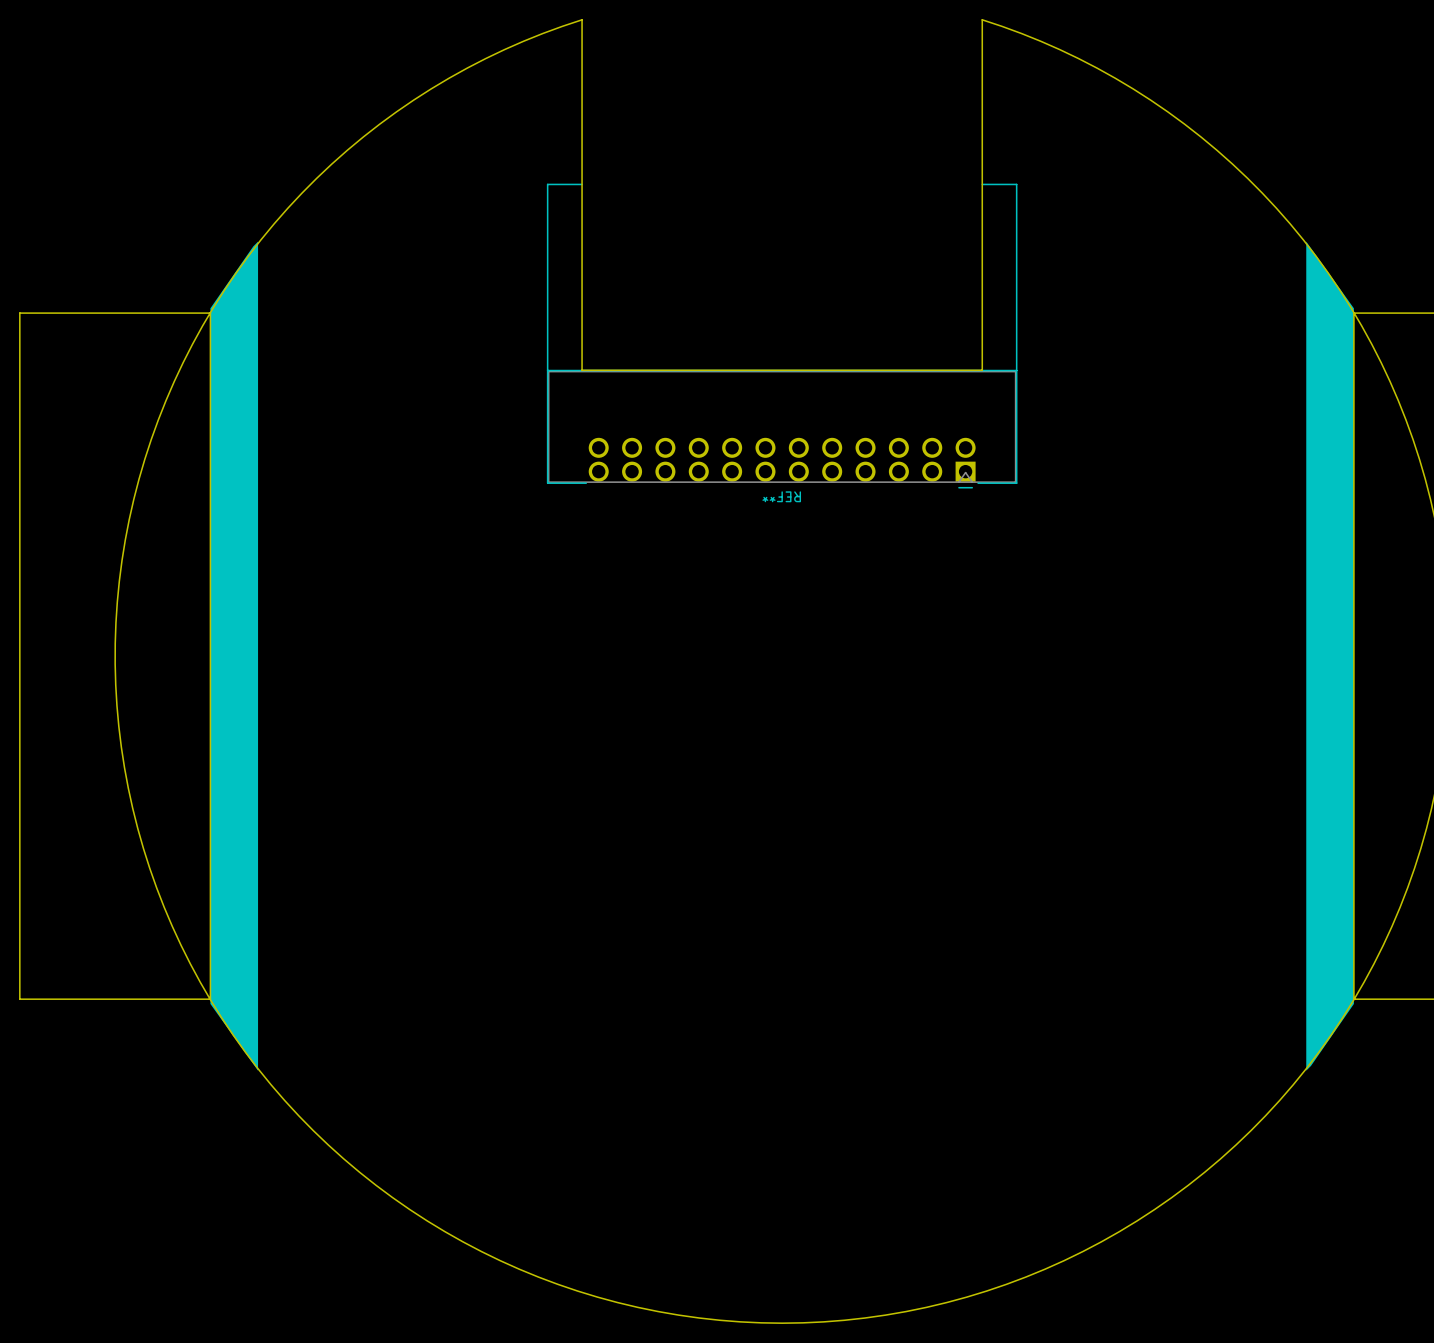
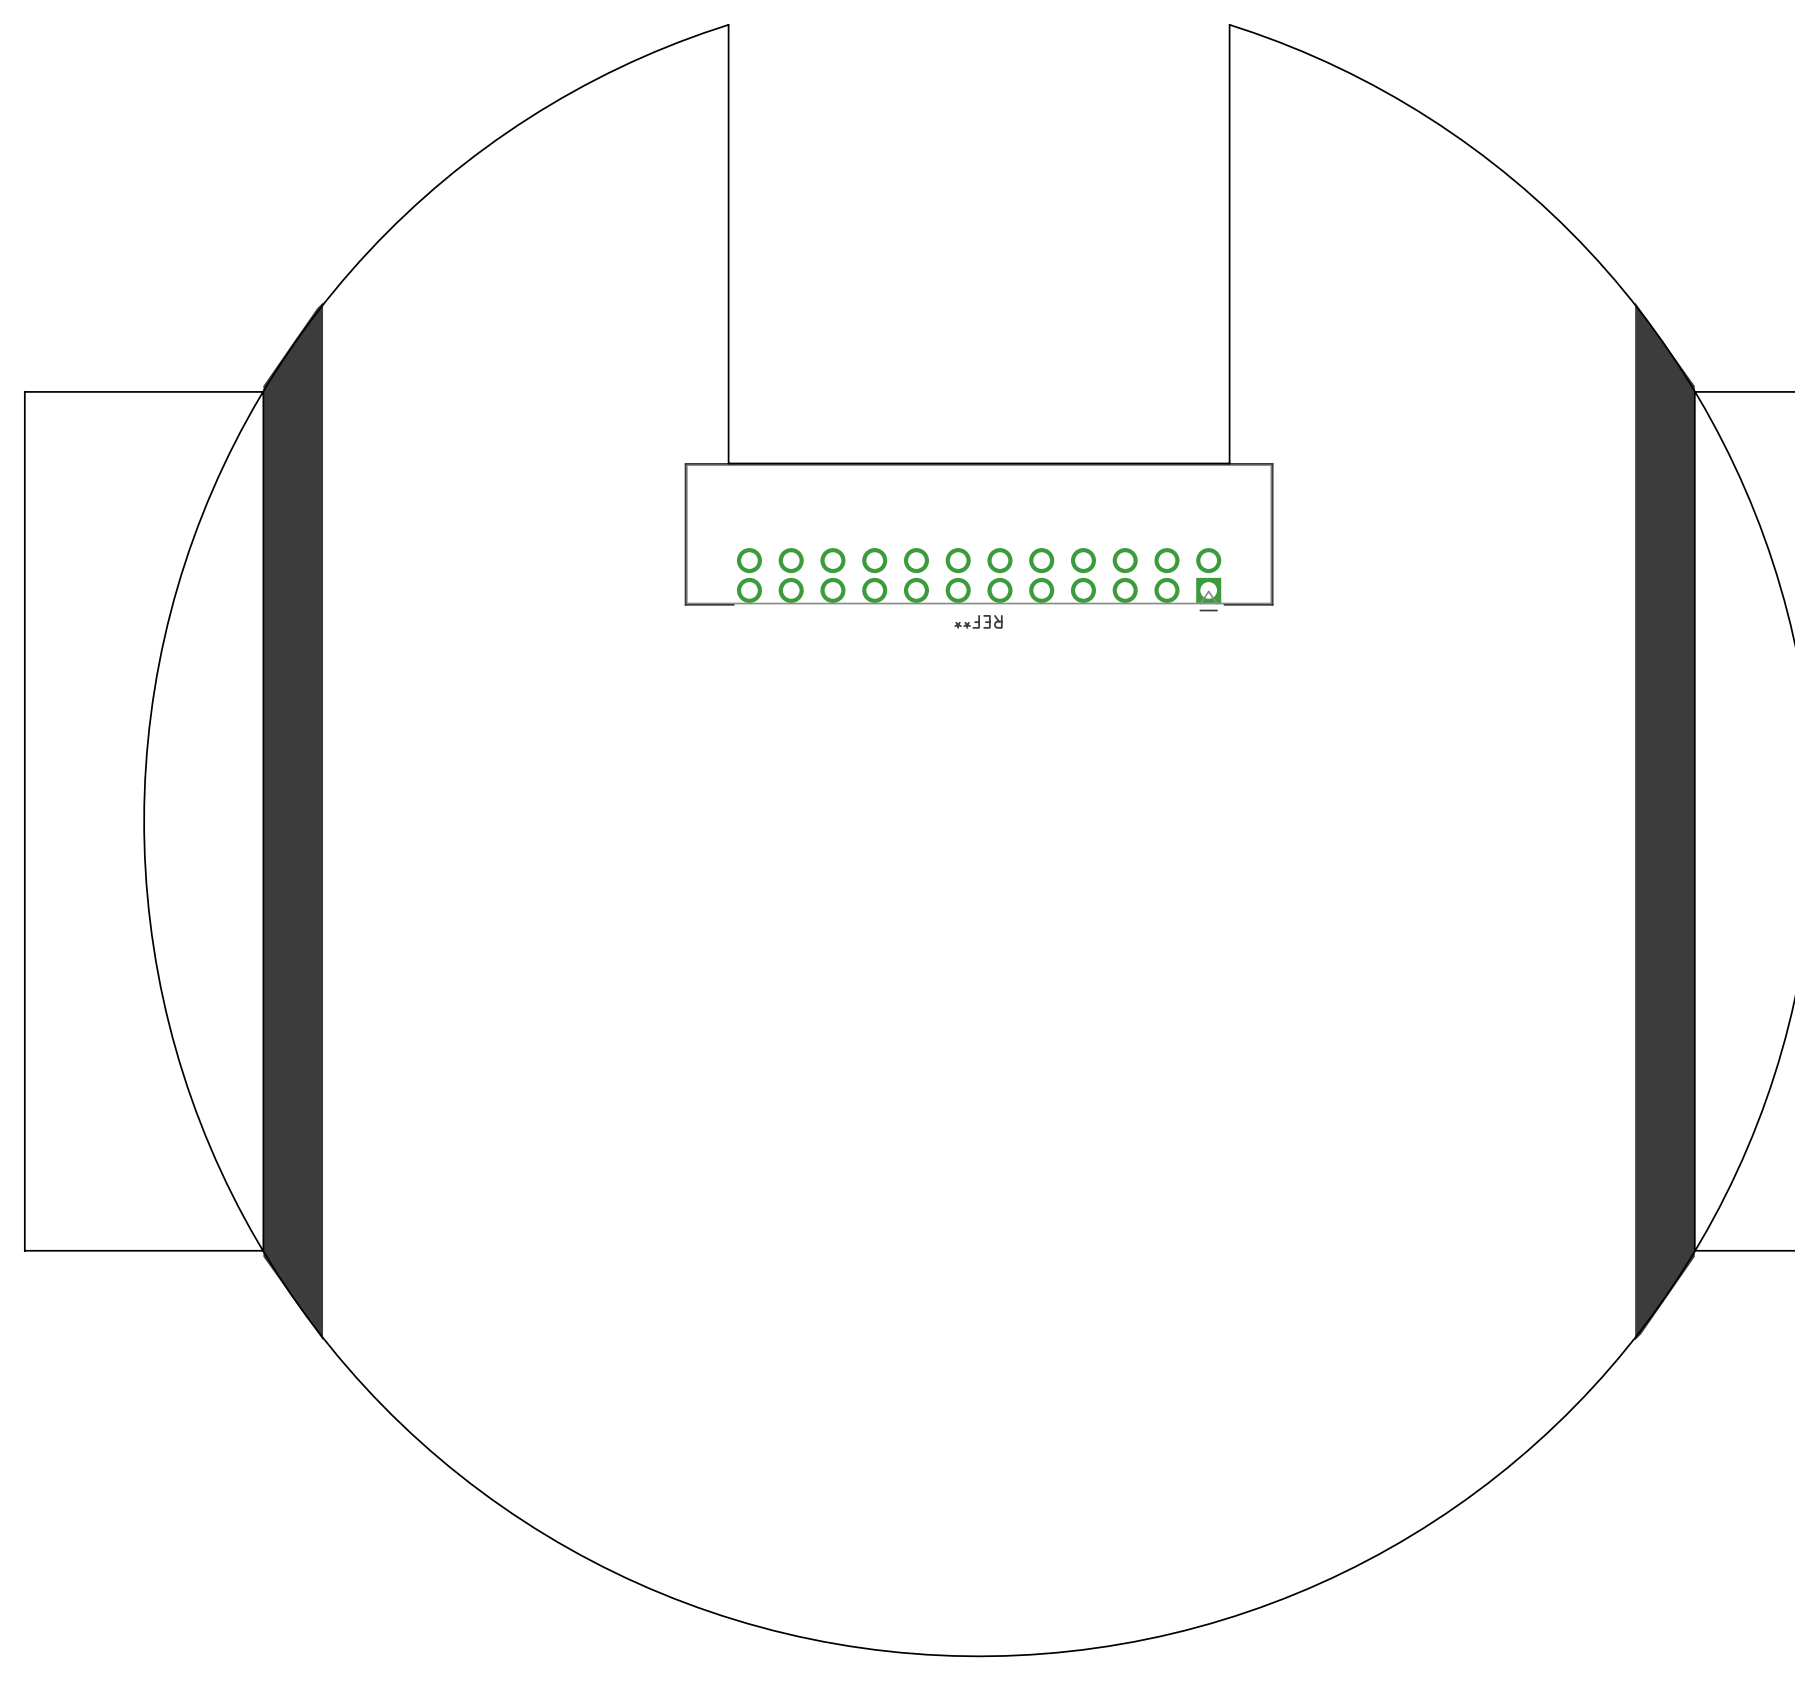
line: (582, 184) (547, 184) (547, 370) -> none
line: (982, 184) (1016, 184) (1016, 370) -> none

